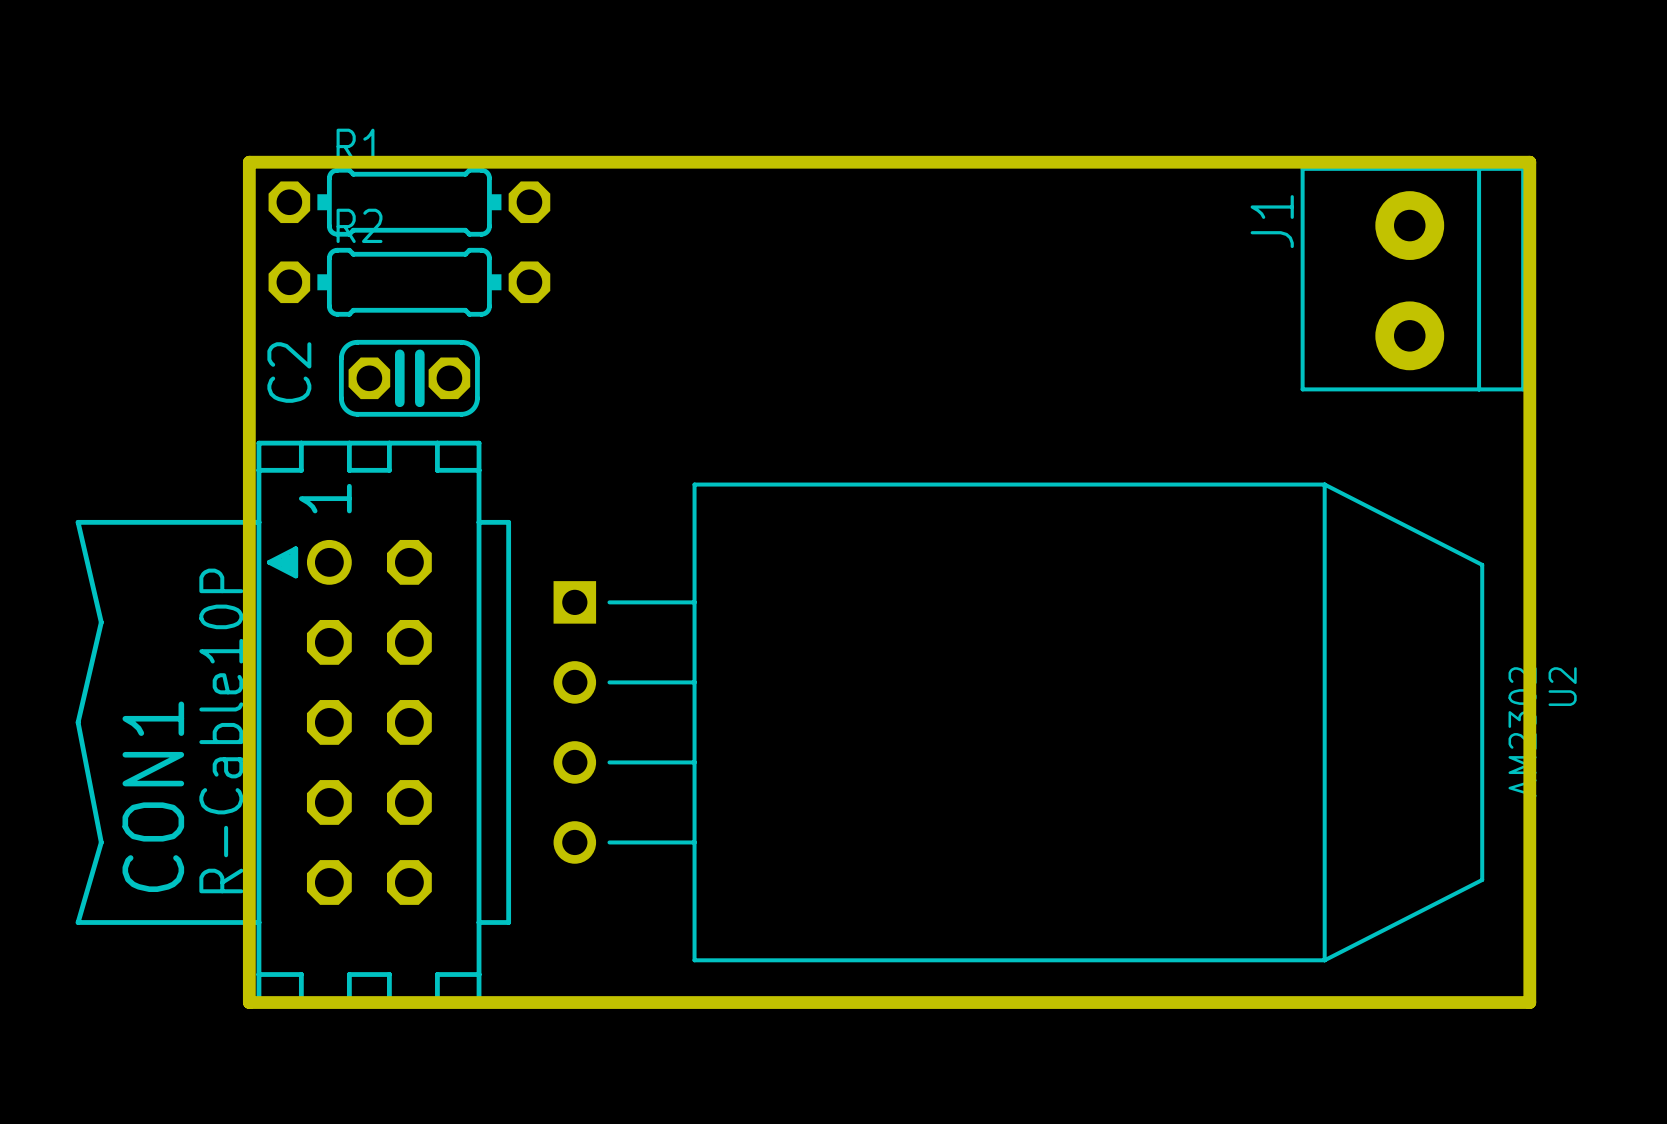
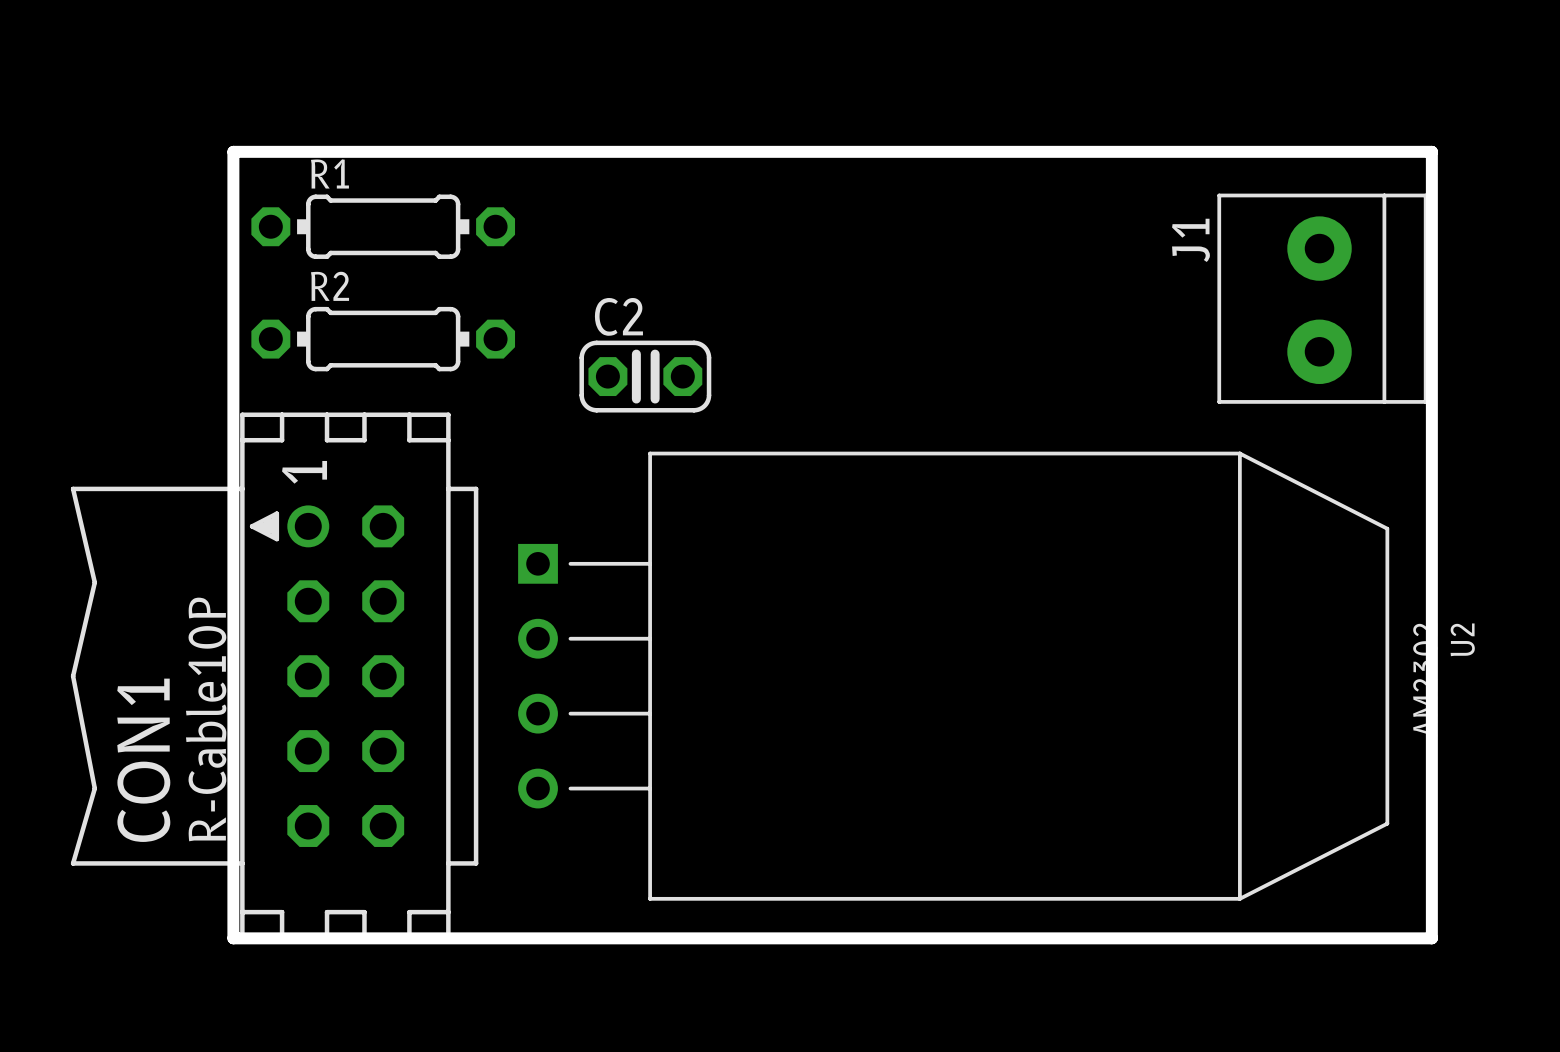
R1 position: (409, 202) -> (383, 226)
J1 position: (1412, 279) -> (1322, 298)
R2 position: (409, 282) -> (383, 339)
C2 name rotation: 0° (289, 372) -> 90° clockwise (618, 316)
C2 name position: C2 (289, 372) -> C2 (618, 316)
C2 position: (409, 378) -> (645, 376)

